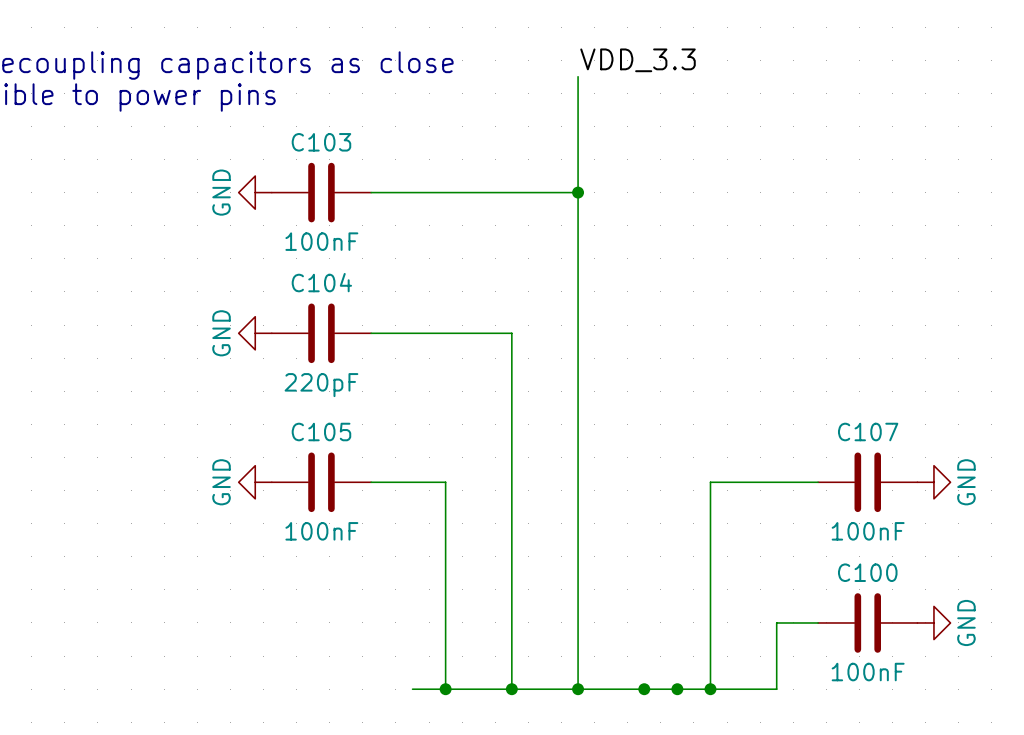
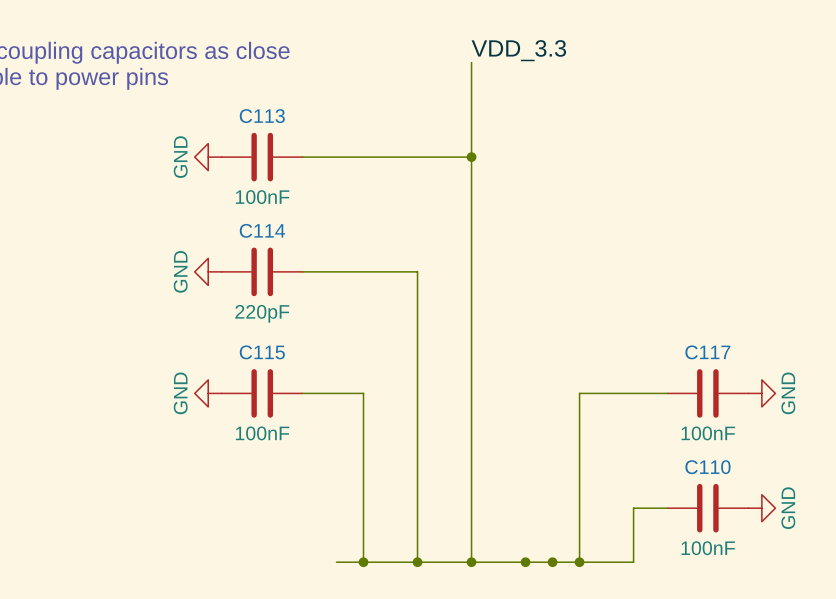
C103 name: C103 (321, 142) -> C113 (262, 116)
C104 name: C104 (321, 282) -> C114 (262, 230)
C105 name: C105 (321, 432) -> C115 (262, 352)
C107 name: C107 (868, 432) -> C117 (707, 352)
C100 name: C100 (867, 572) -> C110 (707, 467)

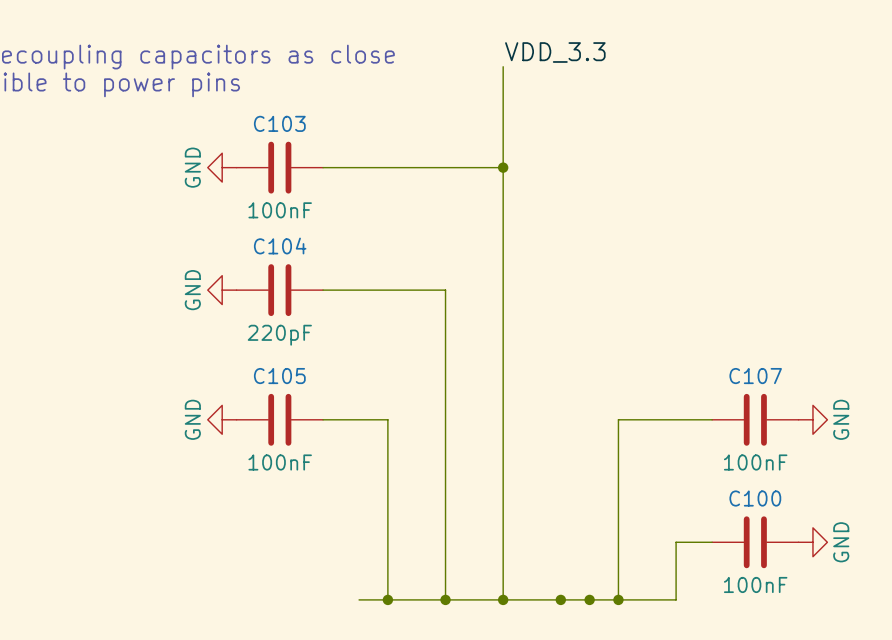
C113 name: C113 (262, 116) -> C103 (279, 123)
C114 name: C114 (262, 230) -> C104 (280, 246)
C115 name: C115 (262, 352) -> C105 (279, 376)
C117 name: C117 (707, 352) -> C107 (755, 376)
C110 name: C110 (707, 467) -> C100 (755, 498)

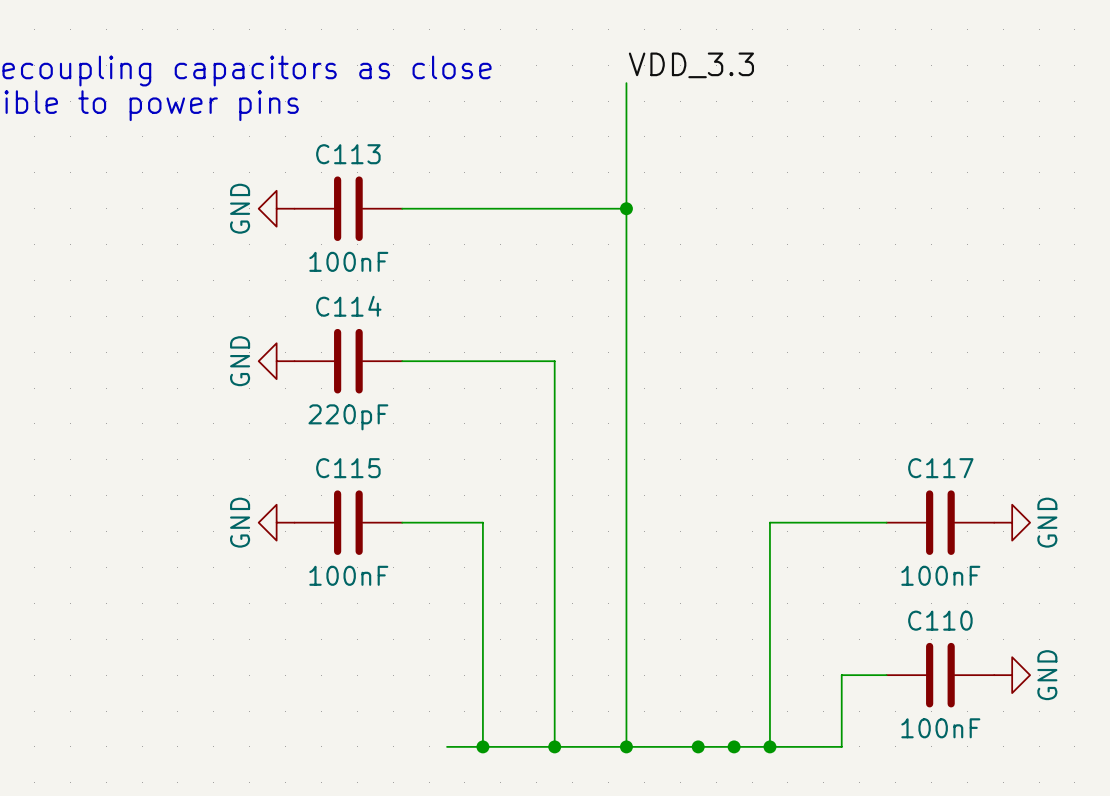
C103 name: C103 (279, 123) -> C113 (348, 154)
C104 name: C104 (280, 246) -> C114 (348, 306)
C105 name: C105 (279, 376) -> C115 (348, 468)
C107 name: C107 (755, 376) -> C117 (940, 468)
C100 name: C100 (755, 498) -> C110 (940, 620)

